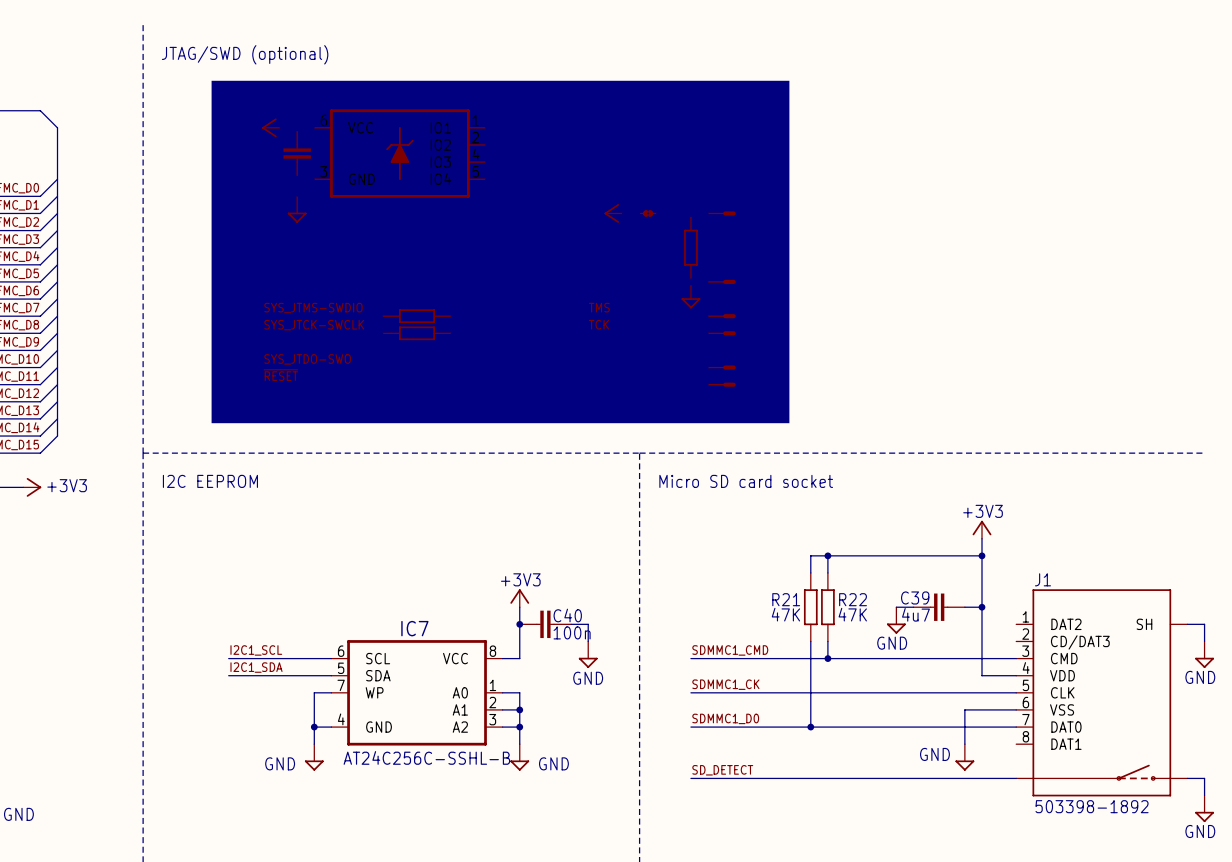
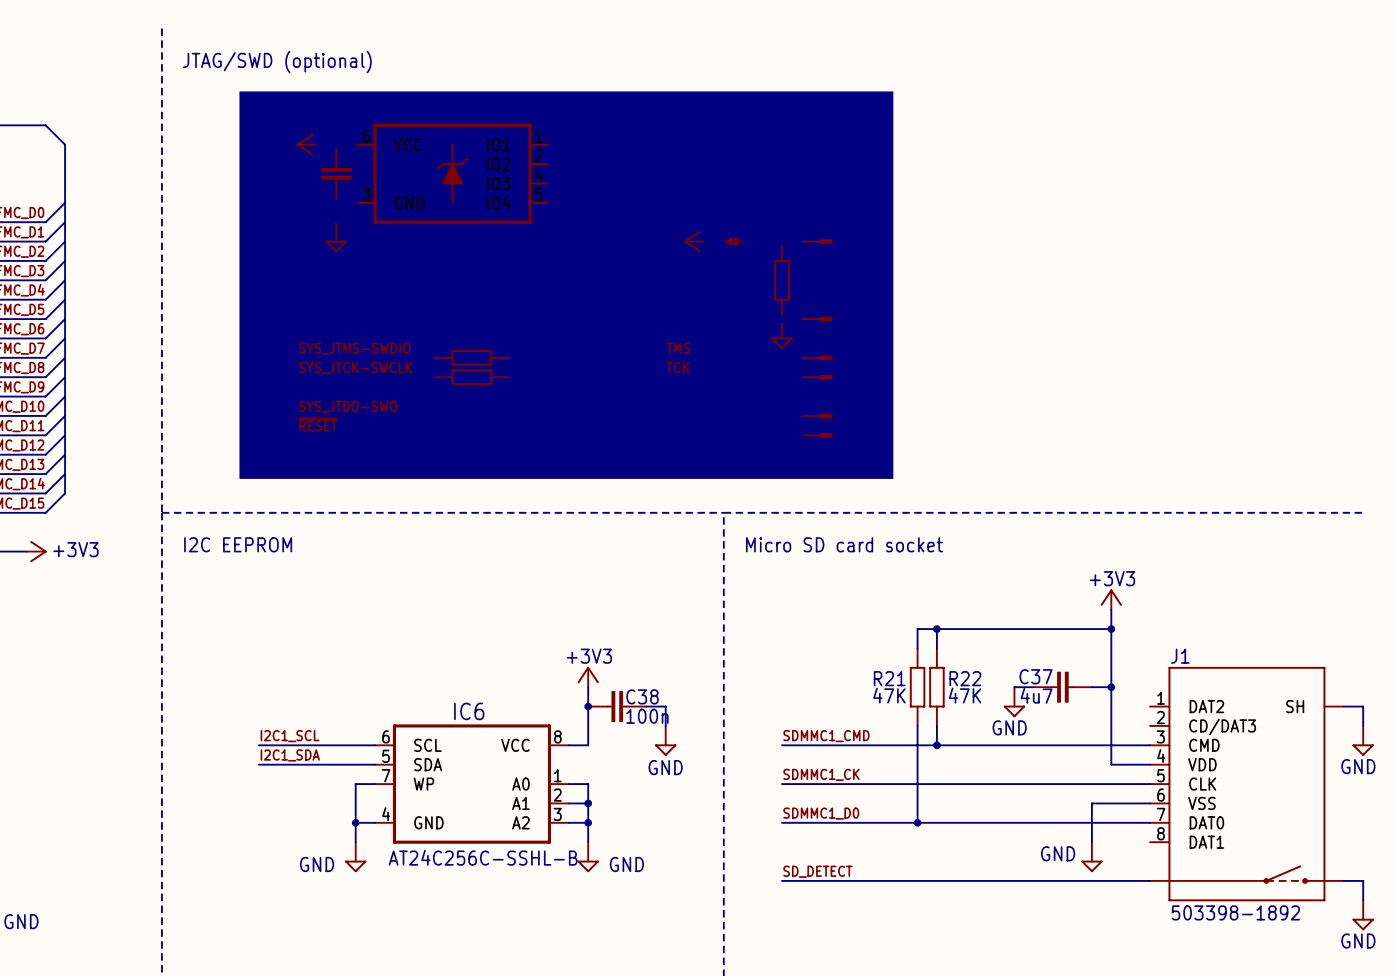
C39 name: C39 (915, 597) -> C37 (1036, 676)
C40 name: C40 (567, 615) -> C38 (642, 696)
IC7 name: IC7 (414, 628) -> IC6 (469, 711)

